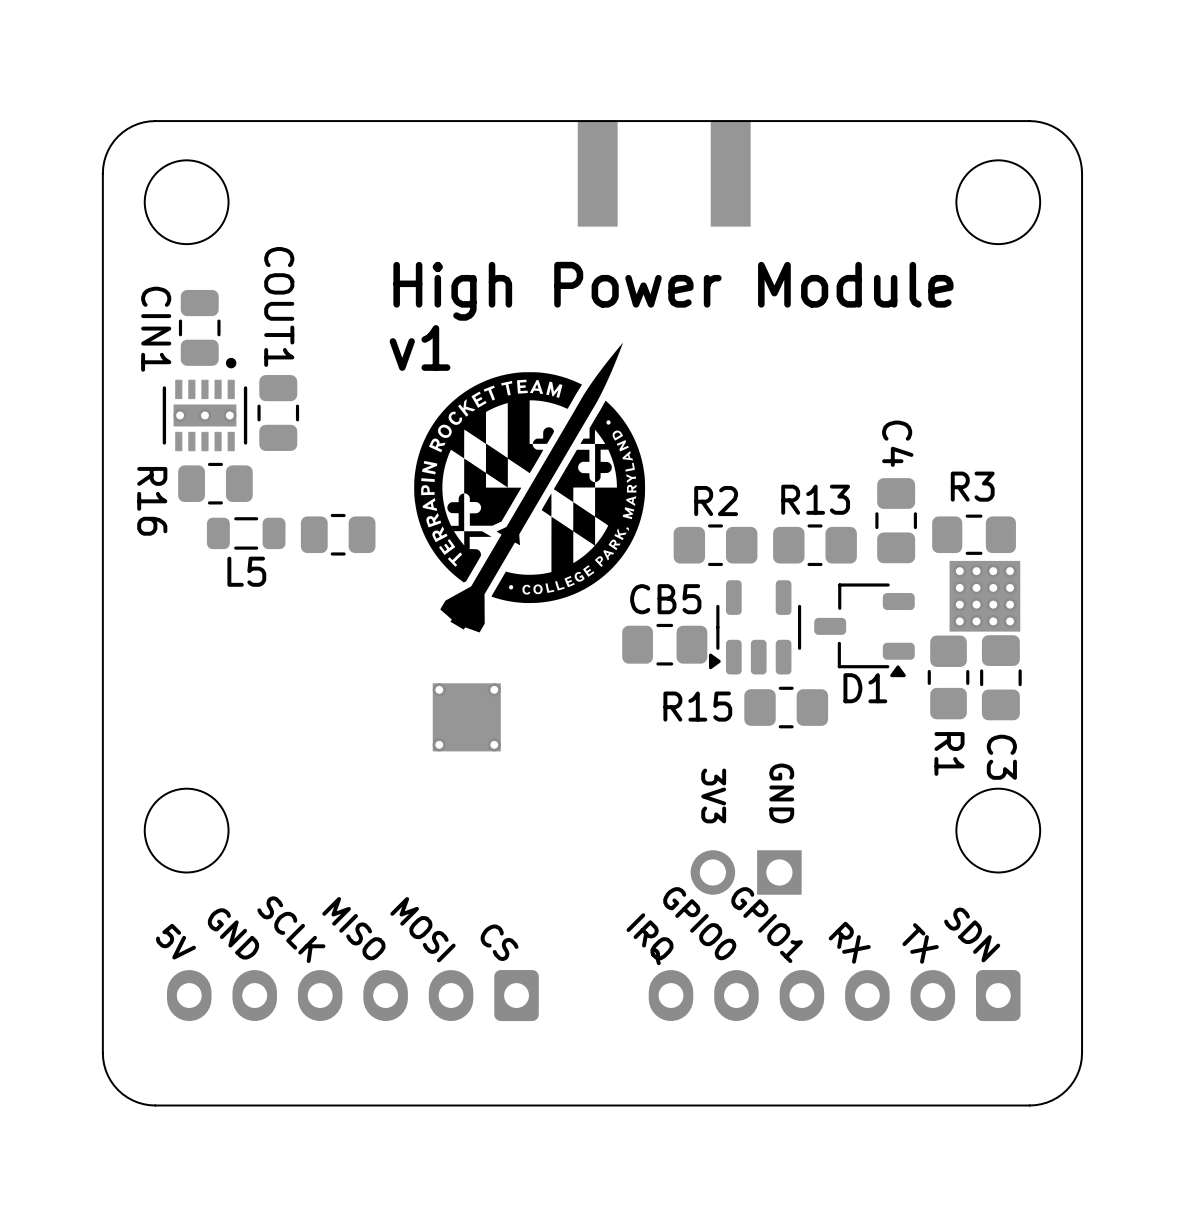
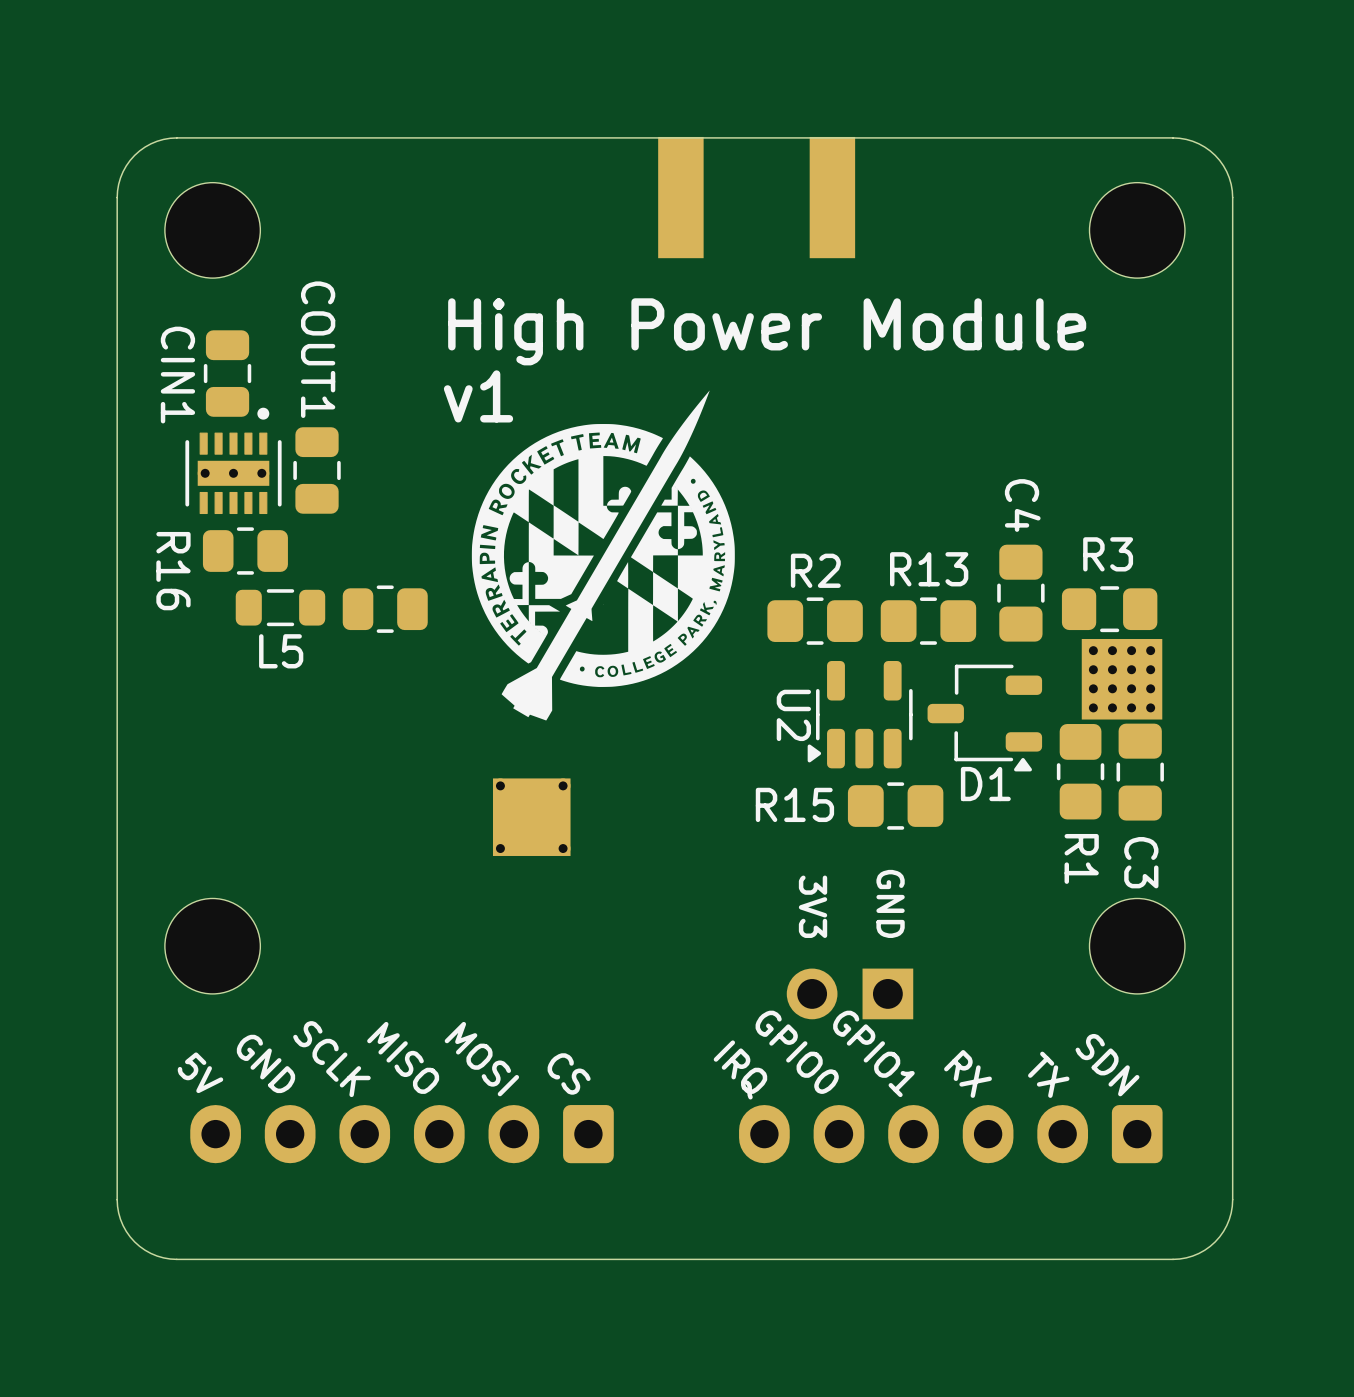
U2 name: none -> U2 (793, 715)
CB5: (664, 644) -> none

